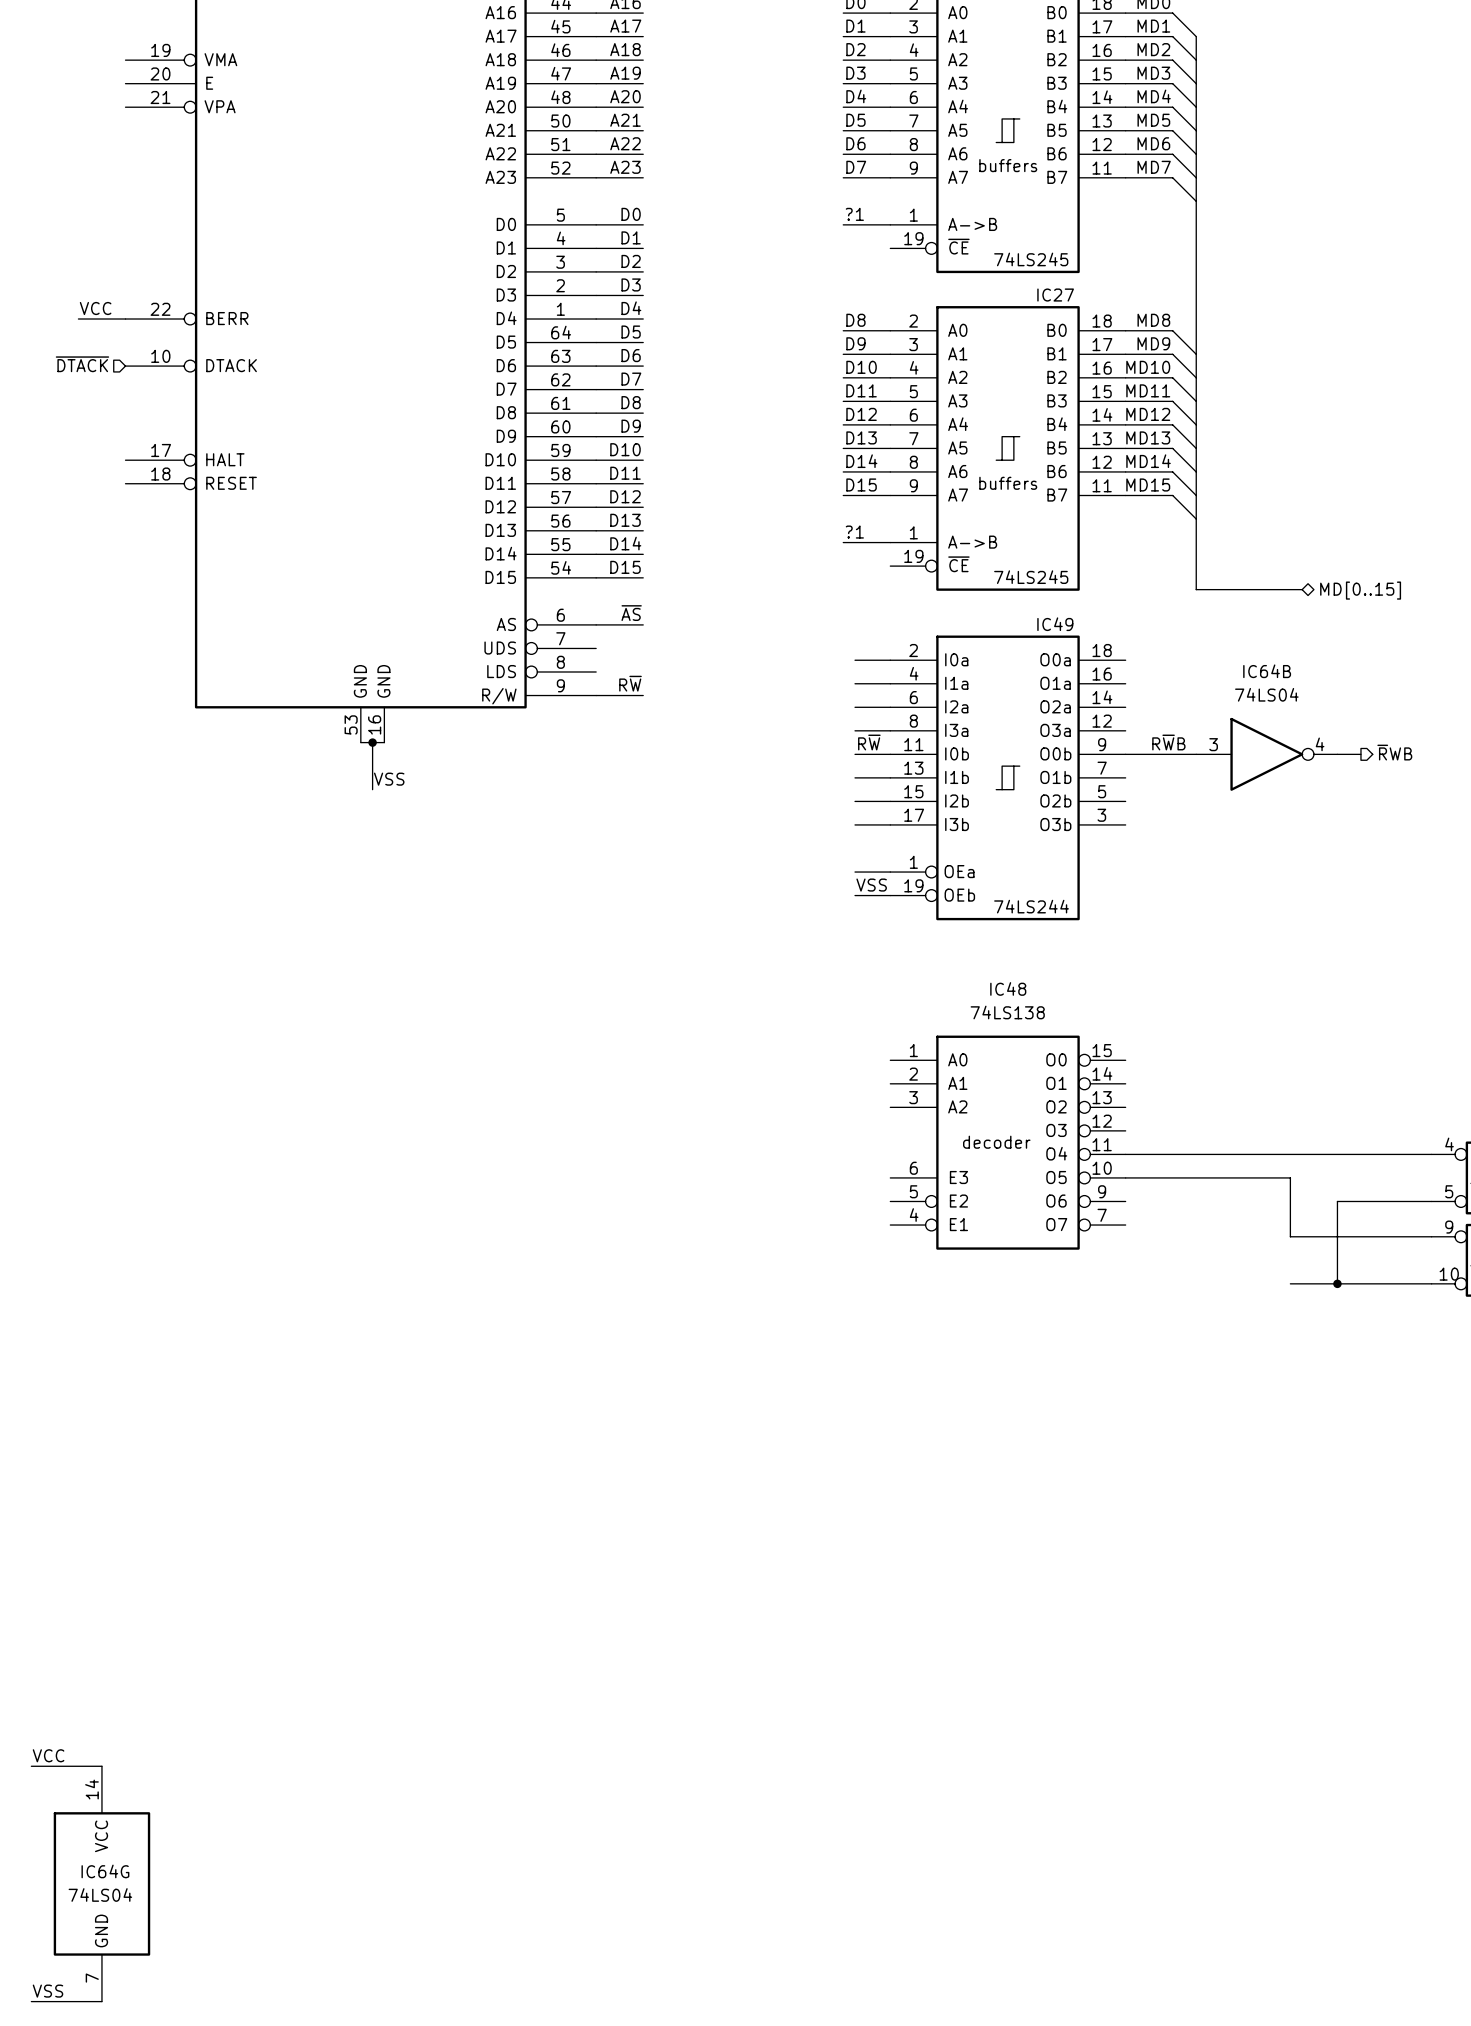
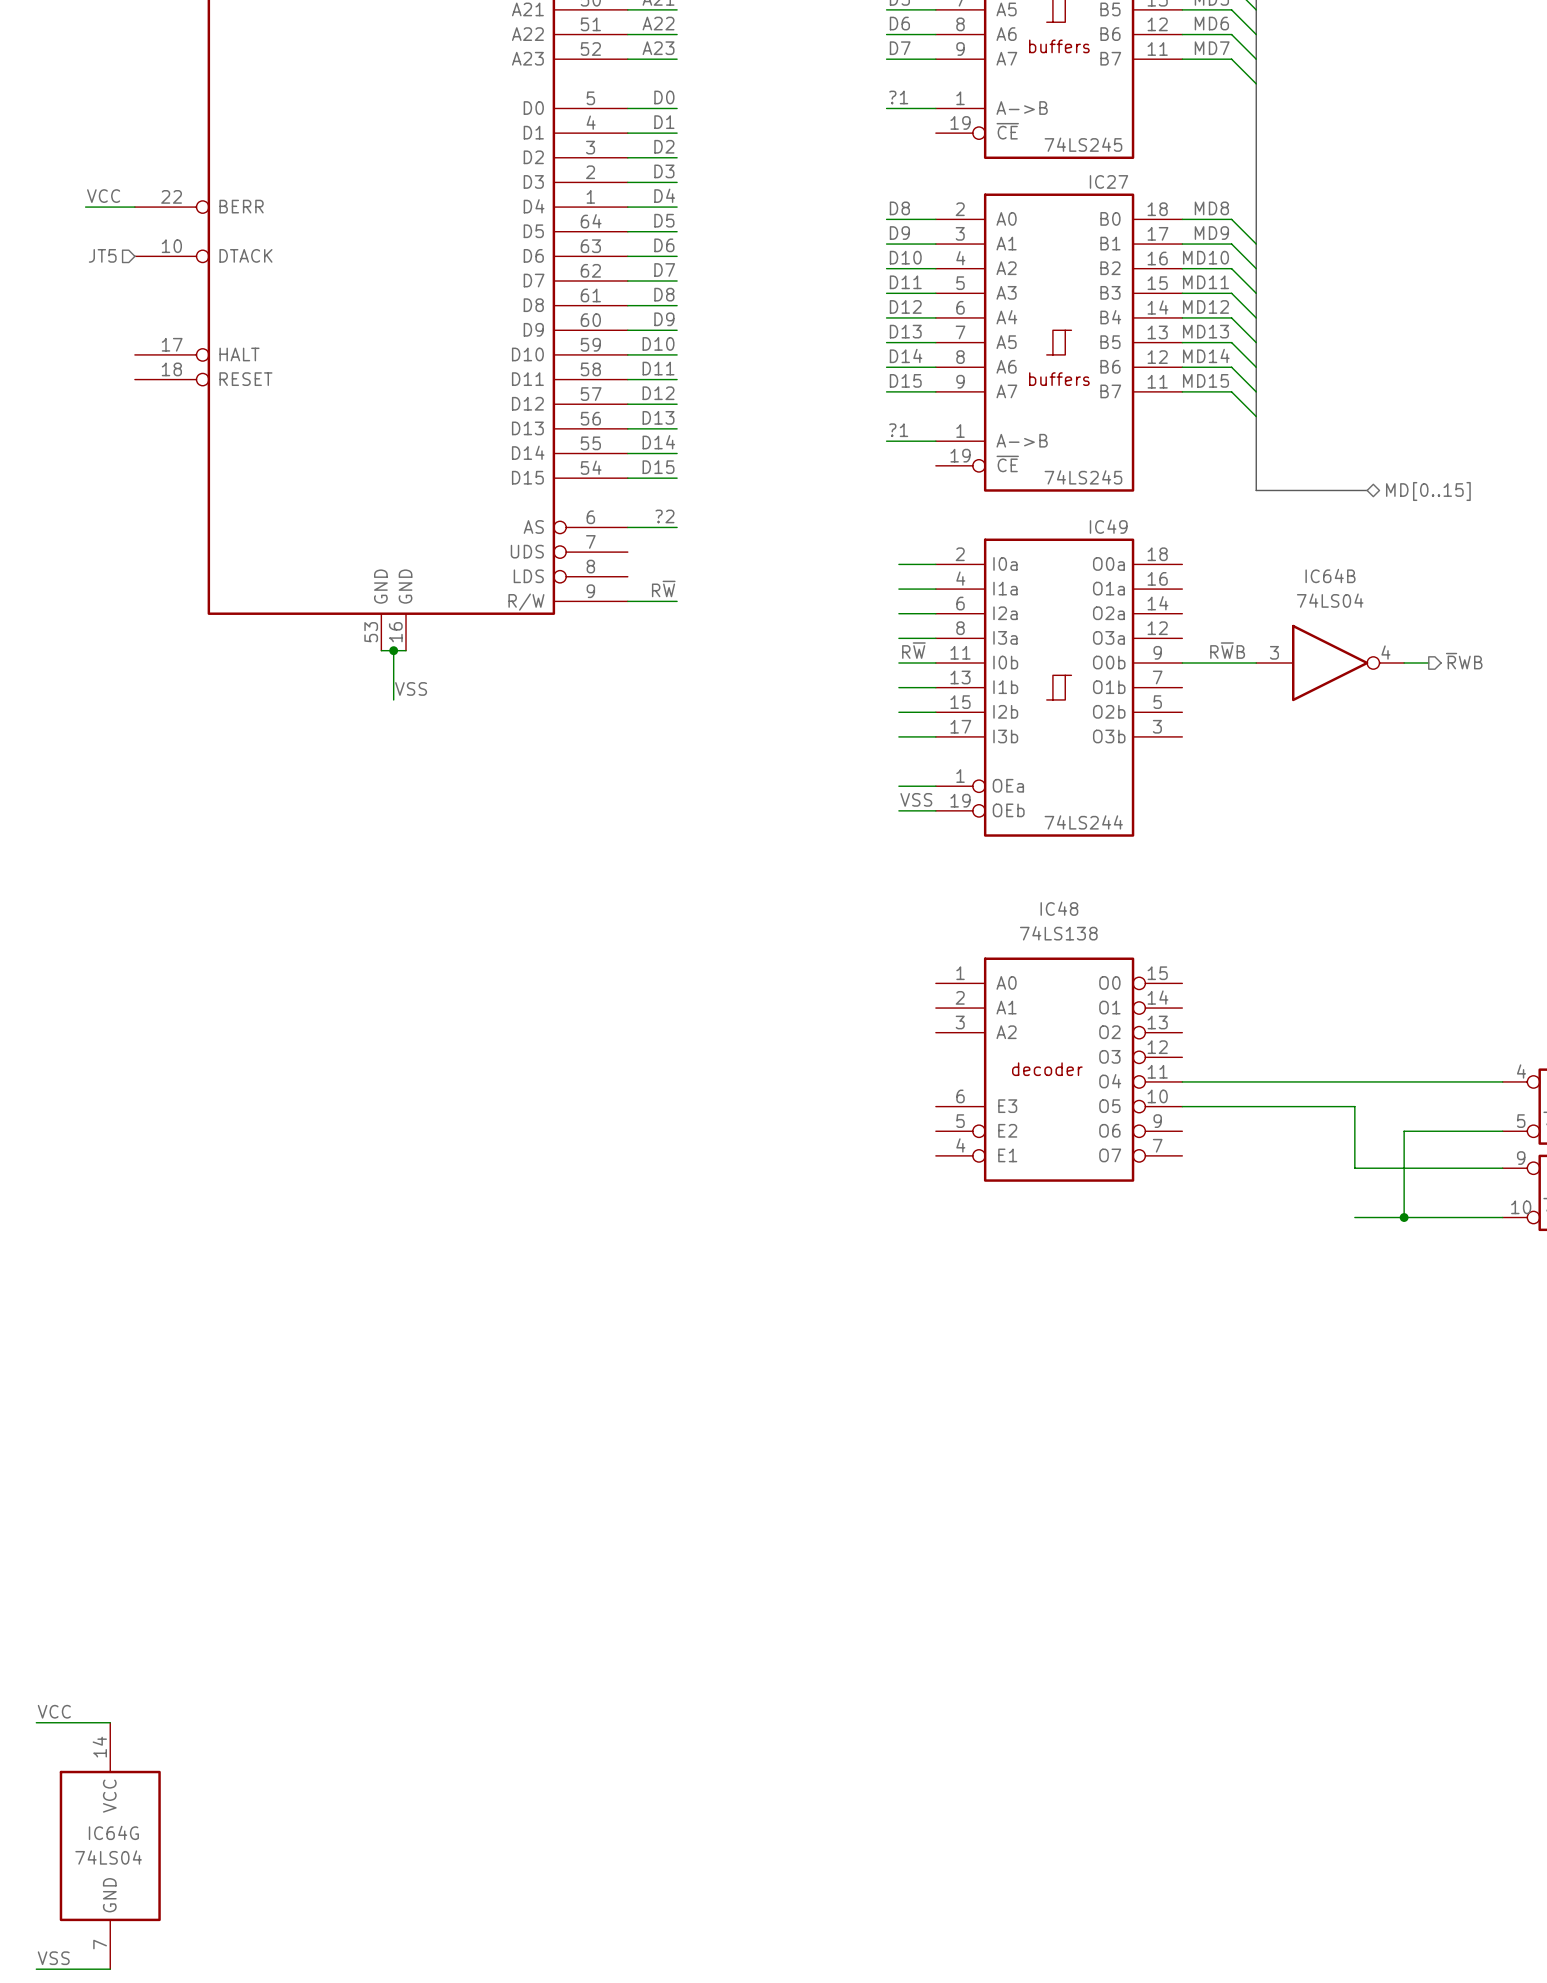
hierarchical label: ~{DTACK} (82, 364) -> JT5 (102, 255)
label: ~{AS} (631, 613) -> ?2 (664, 516)

